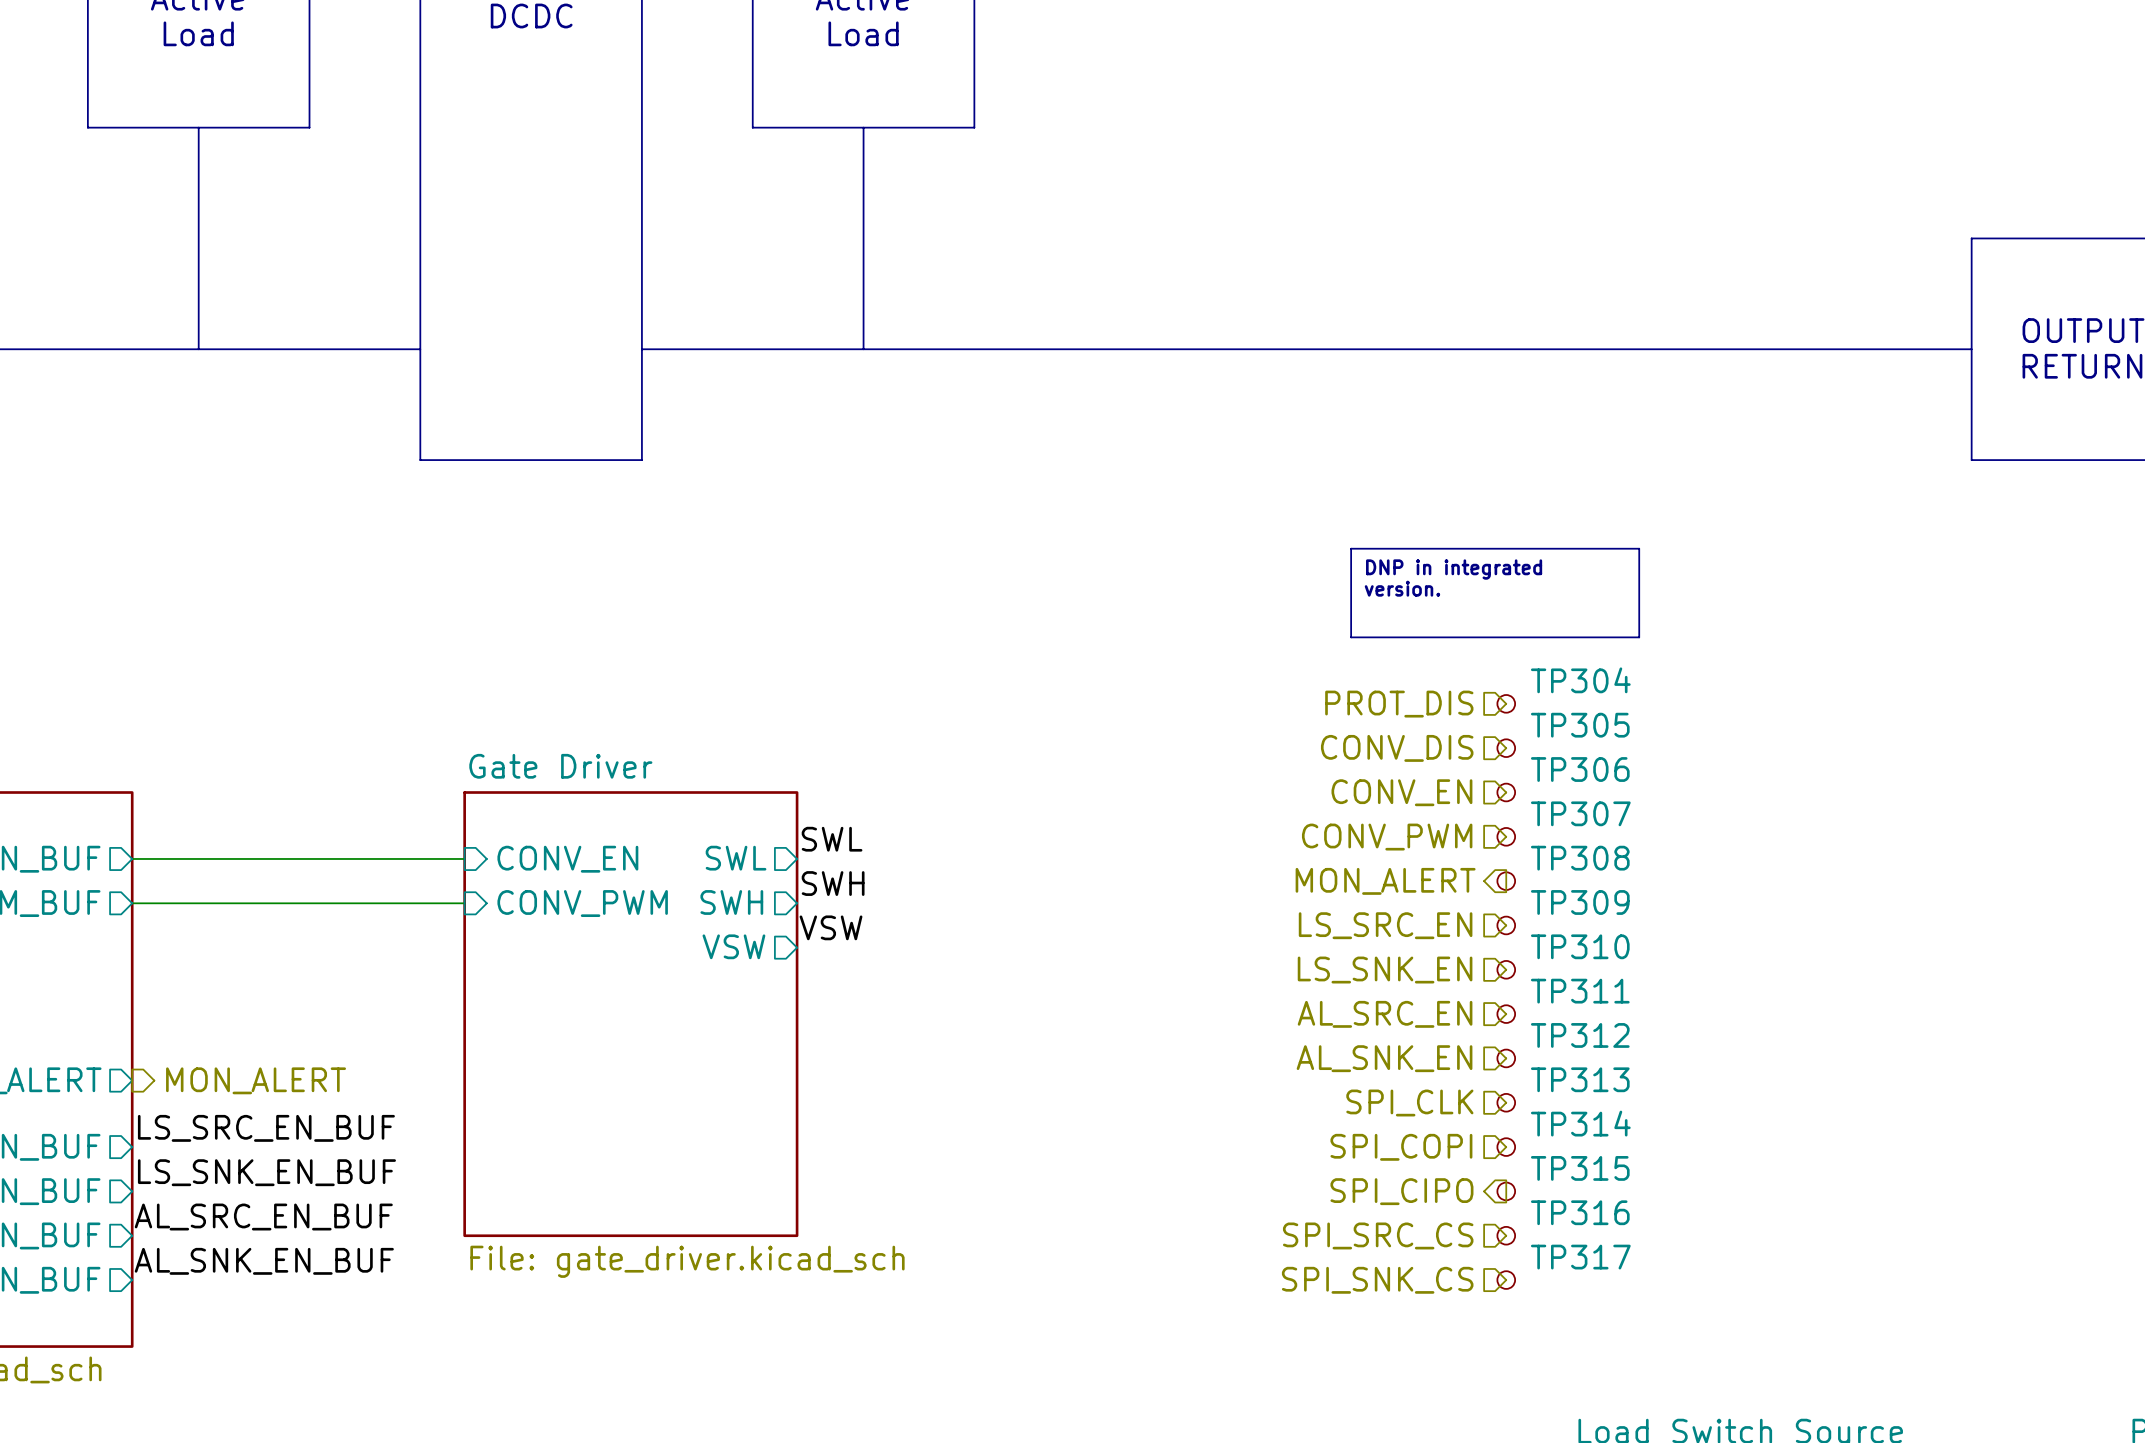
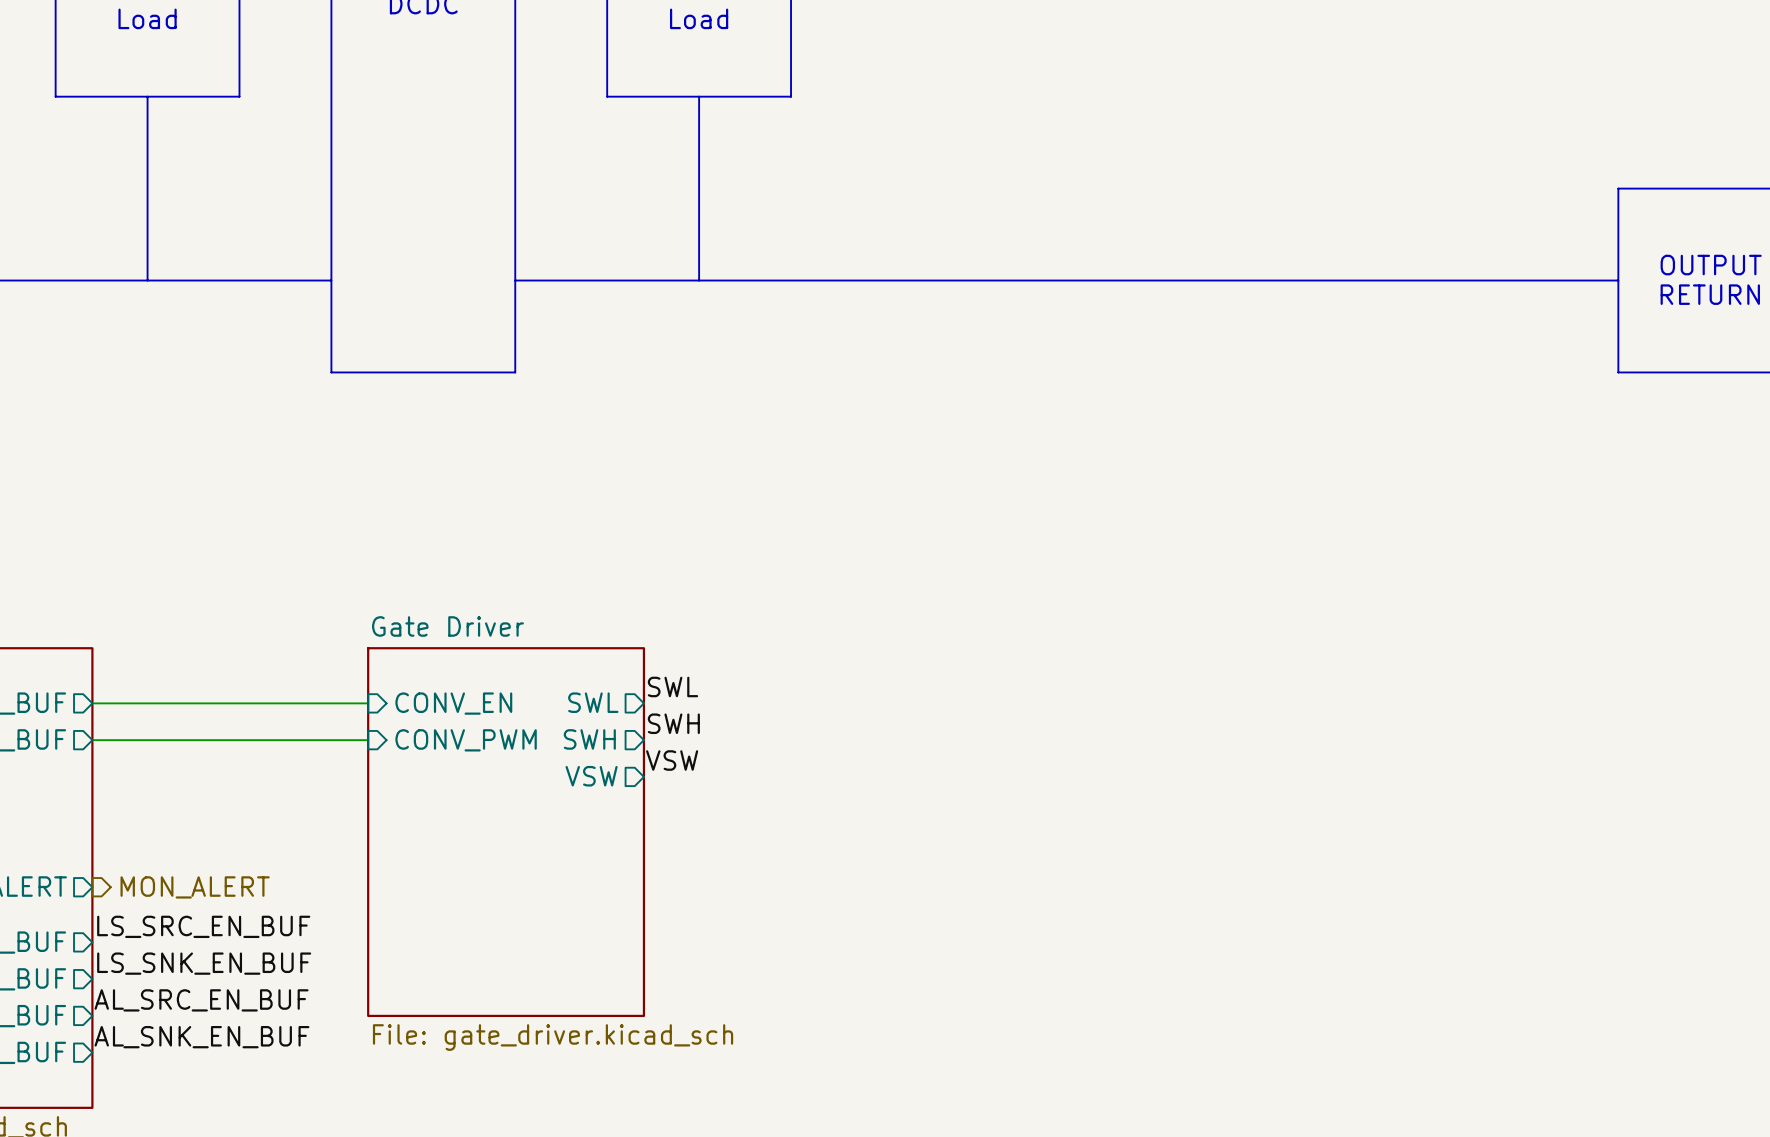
line: (1351, 548) (1639, 548) (1639, 637) (1351, 637) (1351, 548) -> none
text: DNP in integrated (1454, 569) -> none
text: version. (1402, 588) -> none
TP304: (1506, 703) -> none
hierarchical label: PROT_DIS (1399, 704) -> none
hierarchical label: CONV_DIS (1397, 748) -> none
TP305: (1506, 748) -> none
hierarchical label: CONV_EN (1401, 792) -> none
TP306: (1506, 792) -> none
TP307: (1506, 836) -> none
hierarchical label: CONV_PWM (1387, 837) -> none
hierarchical label: MON_ALERT (1385, 881) -> none
TP308: (1506, 881) -> none
hierarchical label: LS_SRC_EN (1385, 925) -> none
TP309: (1506, 925) -> none
TP310: (1506, 969) -> none
hierarchical label: LS_SNK_EN (1385, 970) -> none
hierarchical label: AL_SRC_EN (1385, 1014) -> none
TP311: (1506, 1014) -> none
hierarchical label: AL_SNK_EN (1384, 1058) -> none
TP312: (1506, 1058) -> none
hierarchical label: SPI_CLK (1409, 1102) -> none
TP313: (1506, 1102) -> none
hierarchical label: SPI_COPI (1401, 1147) -> none
TP314: (1506, 1147) -> none
hierarchical label: SPI_CIPO (1401, 1191) -> none
TP315: (1506, 1191) -> none
hierarchical label: SPI_SRC_CS (1378, 1235) -> none
TP316: (1506, 1235) -> none
hierarchical label: SPI_SNK_CS (1377, 1280) -> none
TP317: (1506, 1280) -> none

